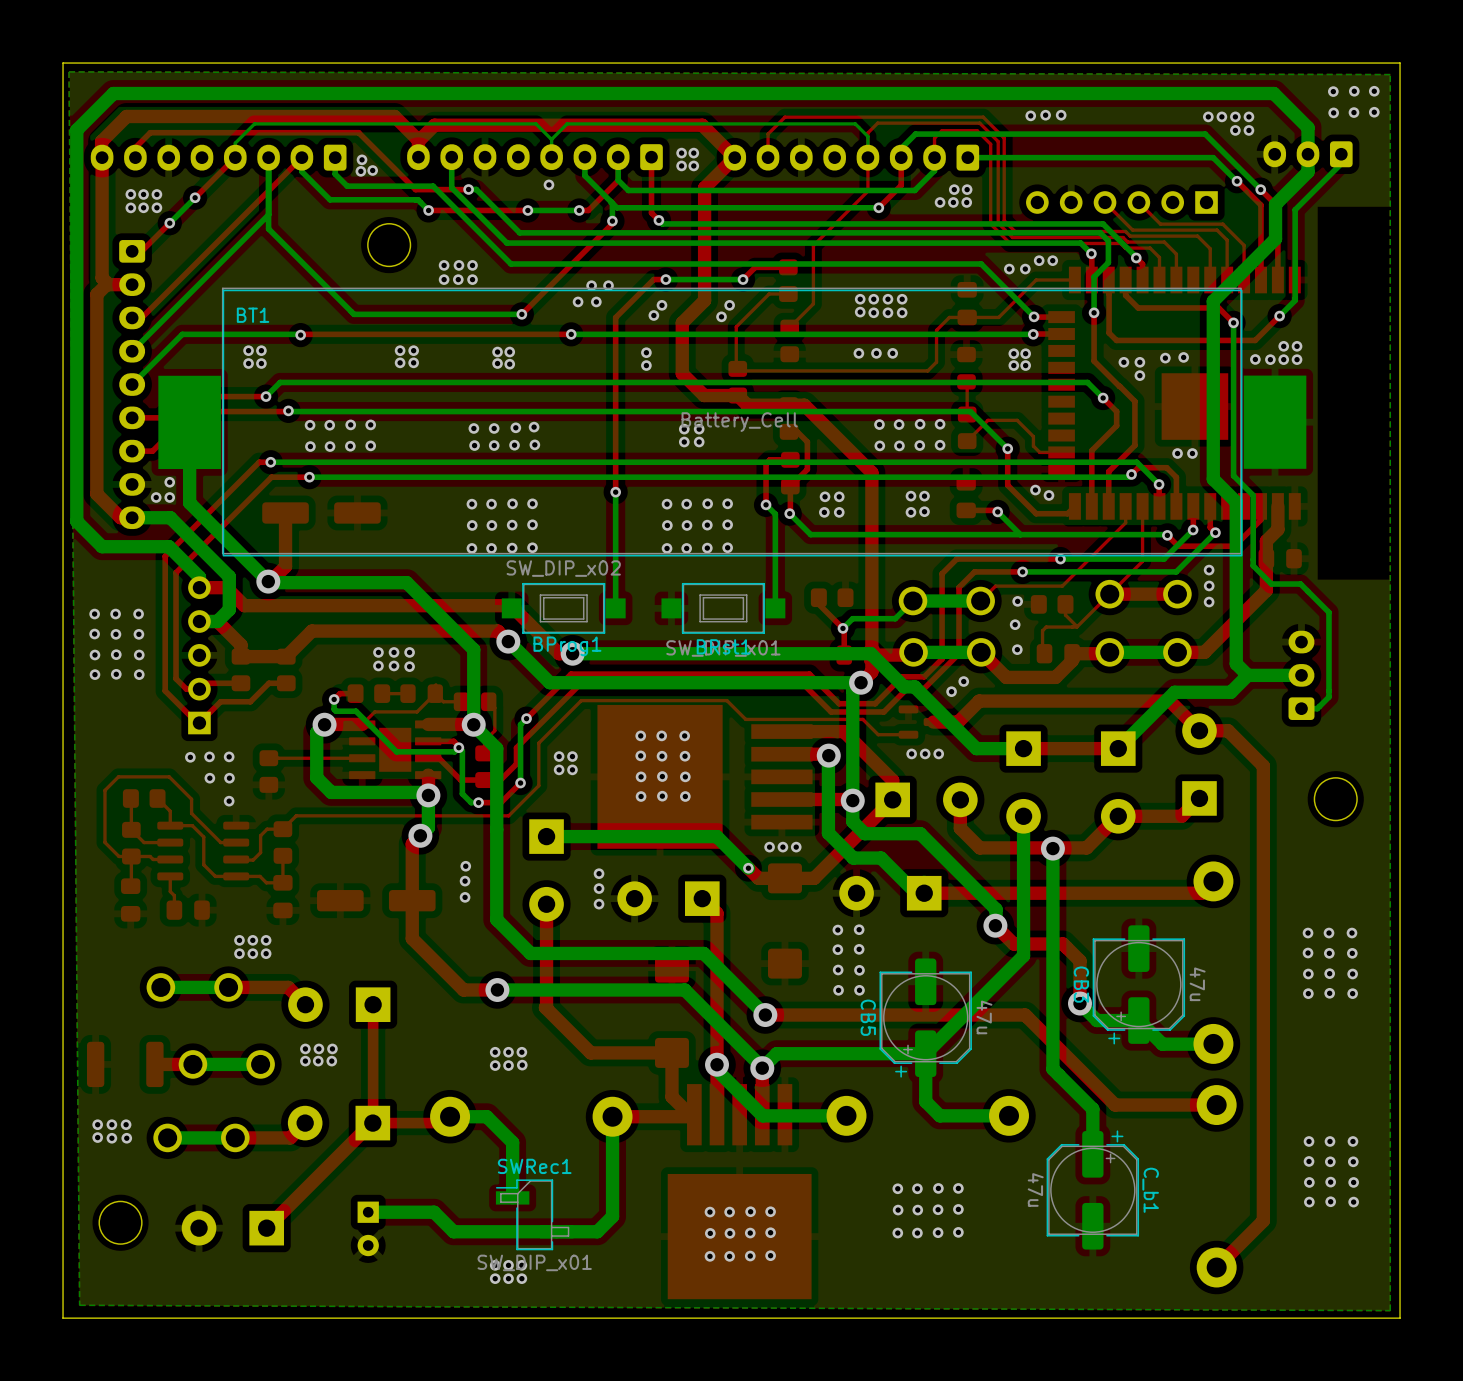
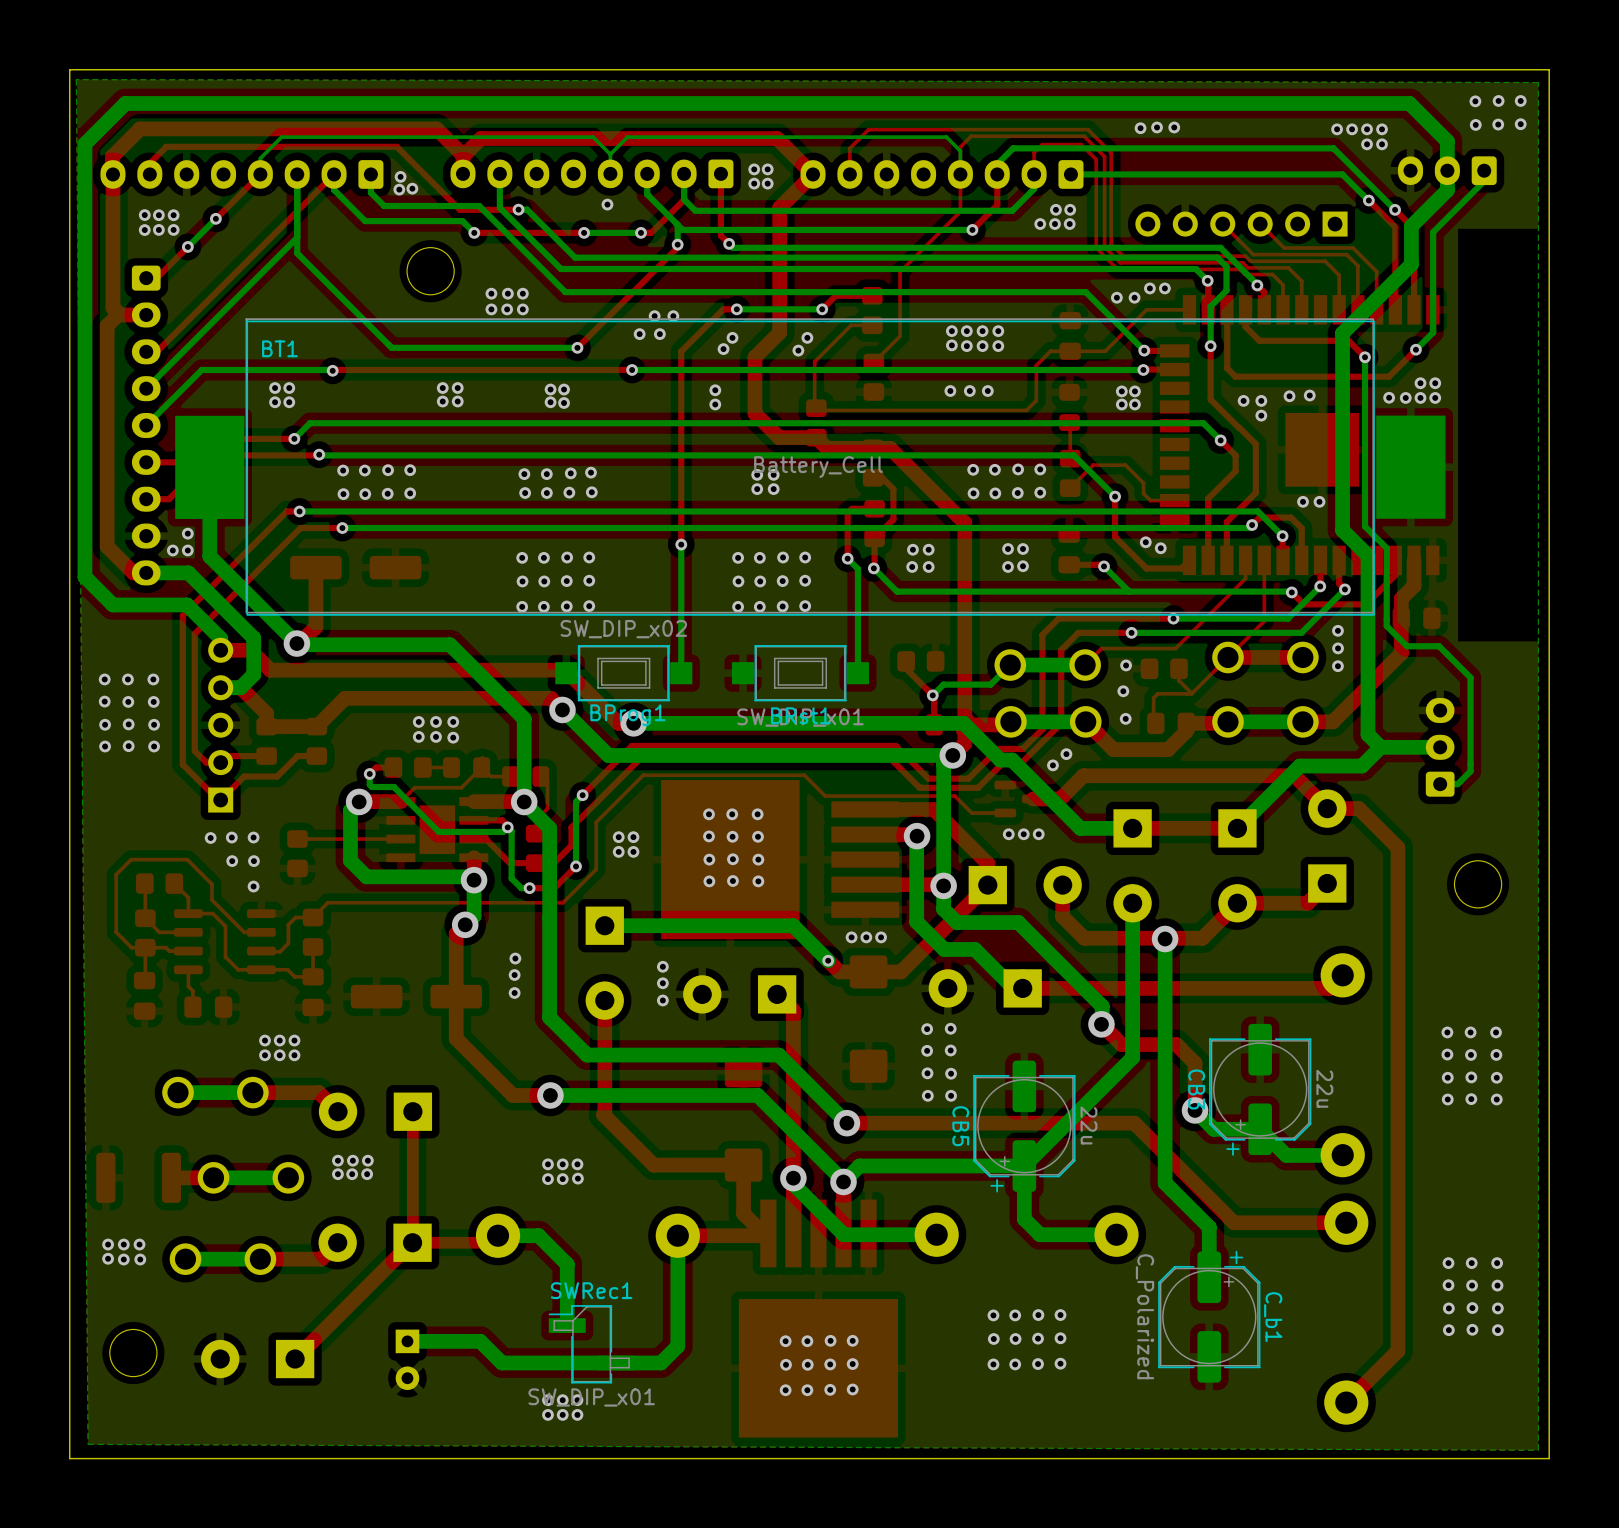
CB3 value: 47u (1197, 984) -> 22u (1324, 1088)
CB5 value: 47u (984, 1017) -> 22u (1089, 1125)
C_b1 value: 47u (1035, 1189) -> C_Polarized (1145, 1316)

